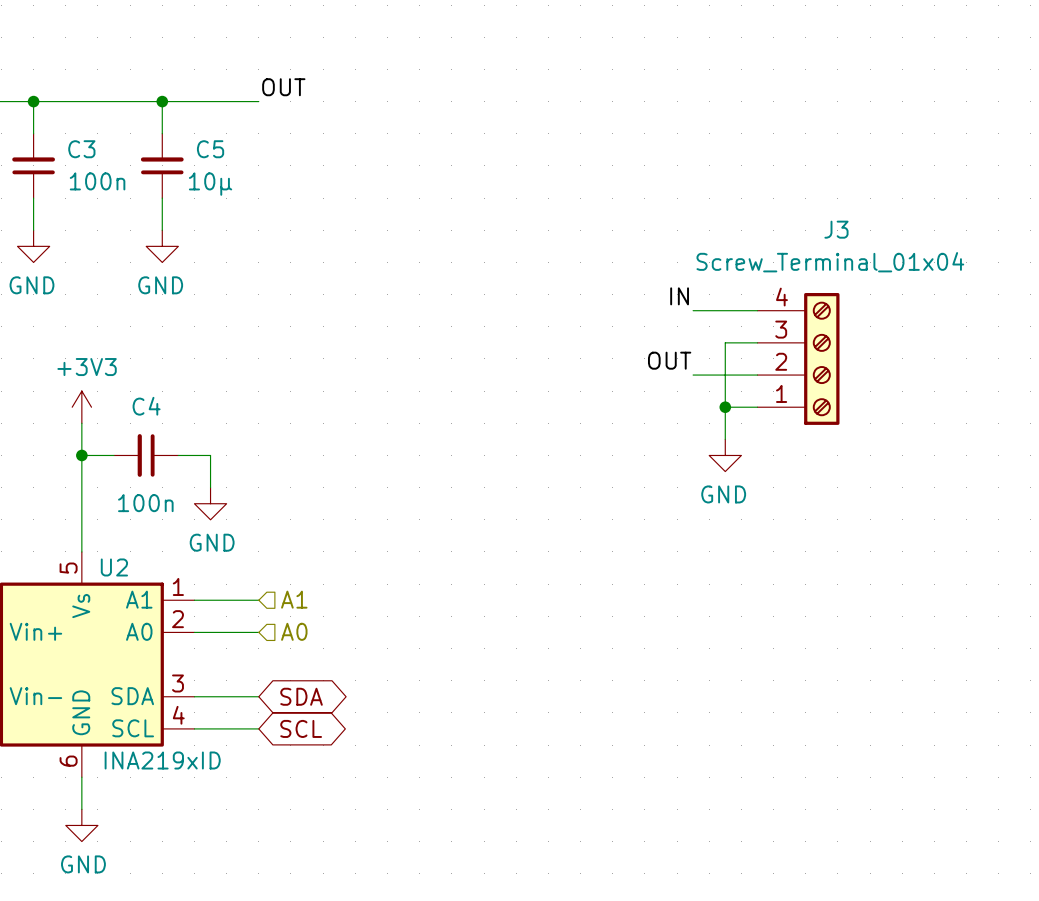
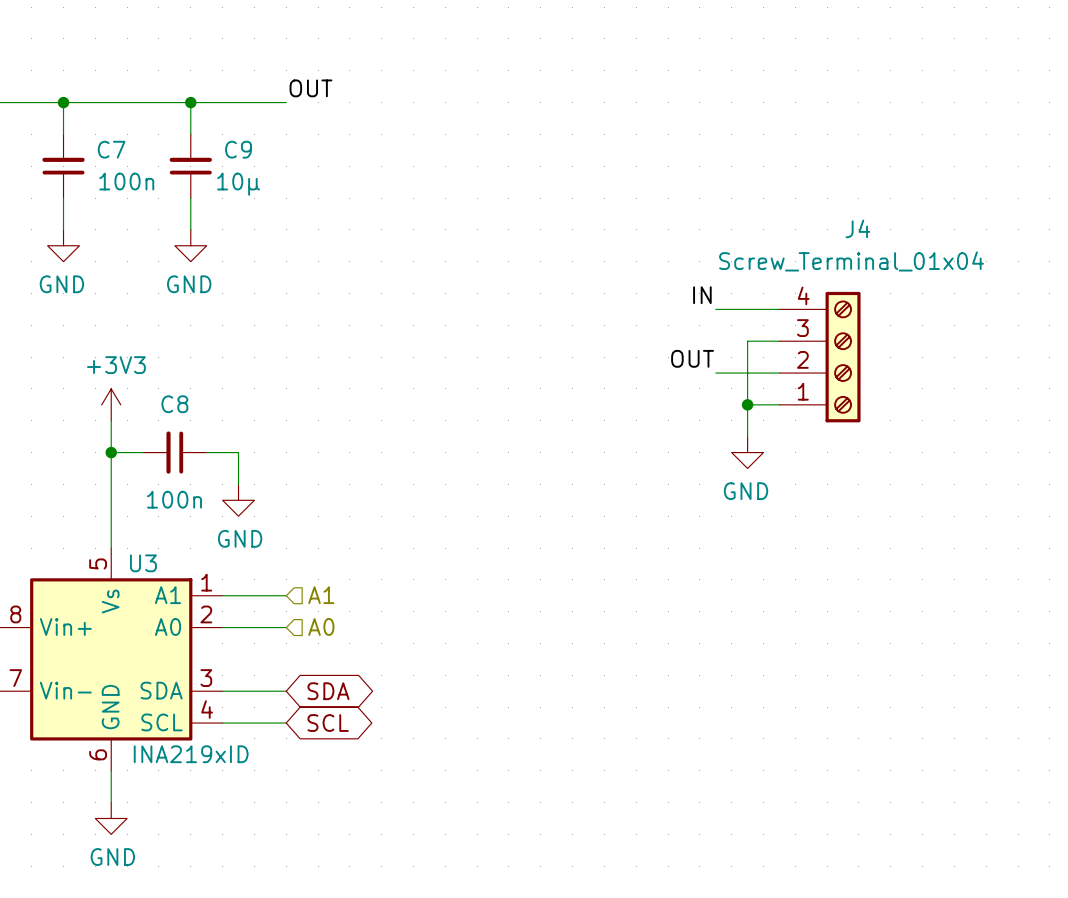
C3 name: C3 (81, 149) -> C7 (111, 149)
C5 name: C5 (210, 149) -> C9 (238, 149)
J3 name: J3 (836, 229) -> J4 (857, 228)
C4 name: C4 (146, 406) -> C8 (174, 404)
U2 name: U2 (114, 567) -> U3 (143, 563)

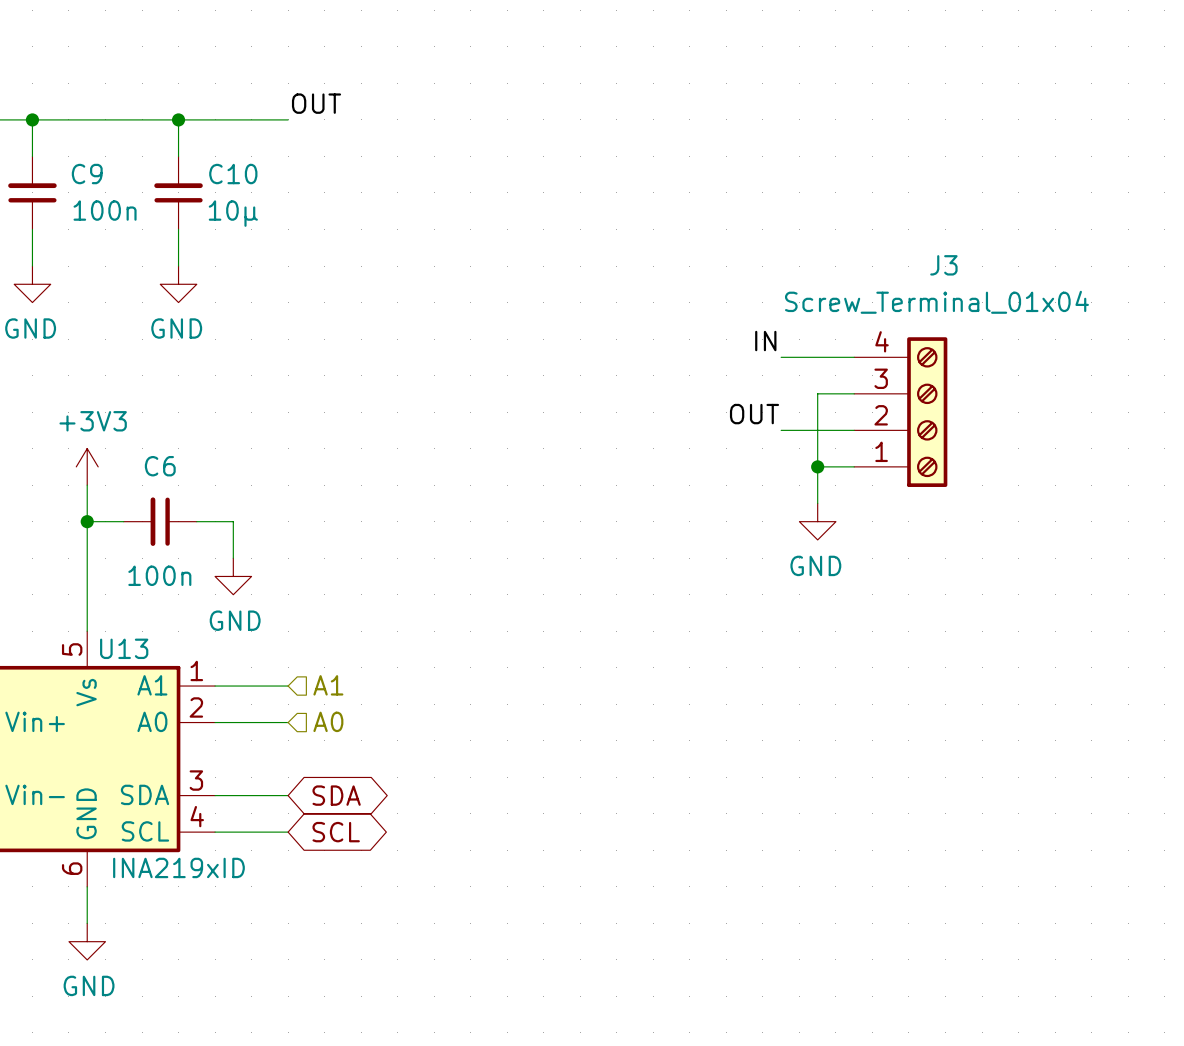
C7 name: C7 (111, 149) -> C9 (87, 174)
C9 name: C9 (238, 149) -> C10 (233, 174)
J4 name: J4 (857, 228) -> J3 (943, 265)
C8 name: C8 (174, 404) -> C6 (160, 466)
U3 name: U3 (143, 563) -> U13 (124, 648)

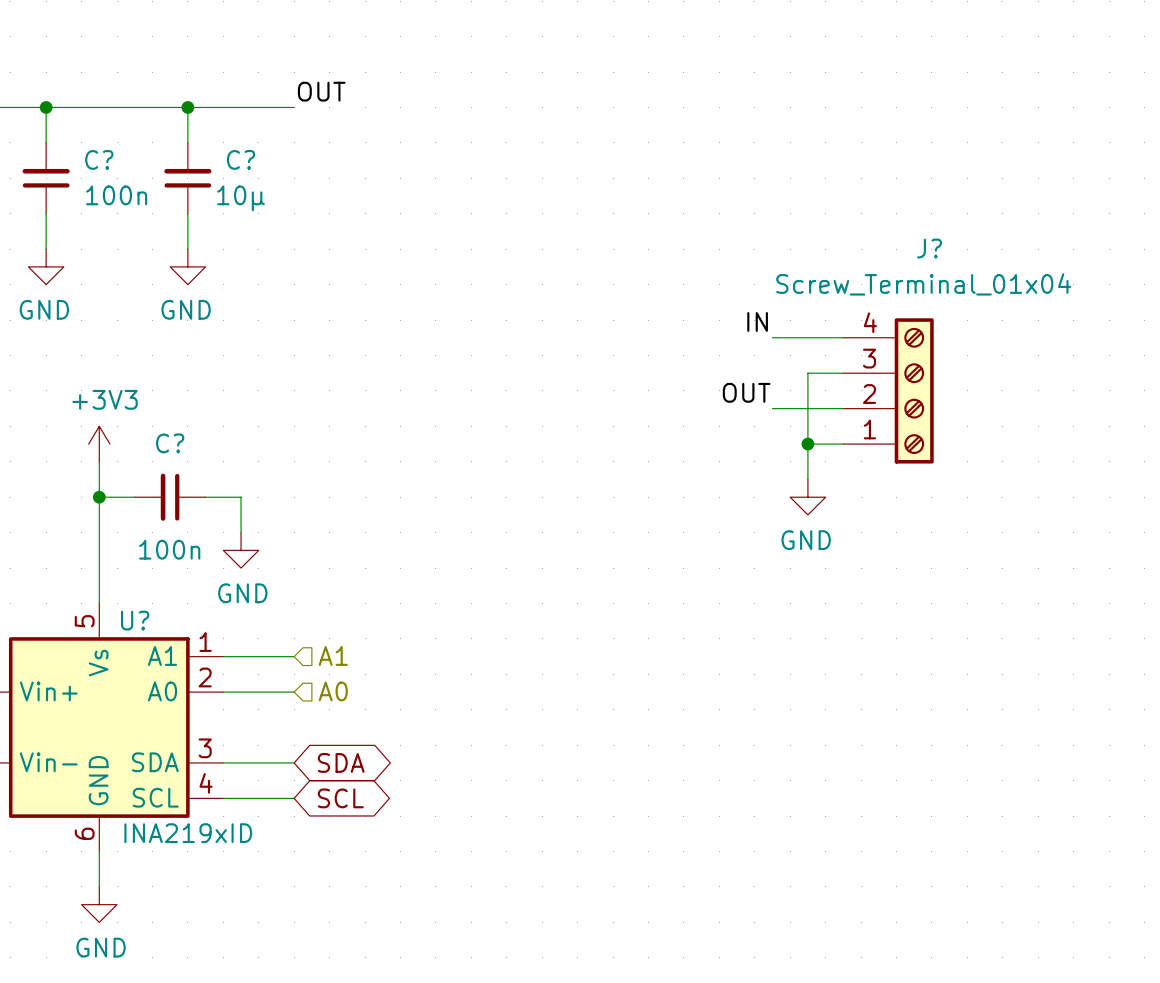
C9 name: C9 (87, 174) -> C? (99, 159)
C10 name: C10 (233, 174) -> C? (241, 159)
J3 name: J3 (943, 265) -> J? (929, 248)
C6 name: C6 (160, 466) -> C? (170, 443)
U13 name: U13 (124, 648) -> U? (135, 620)

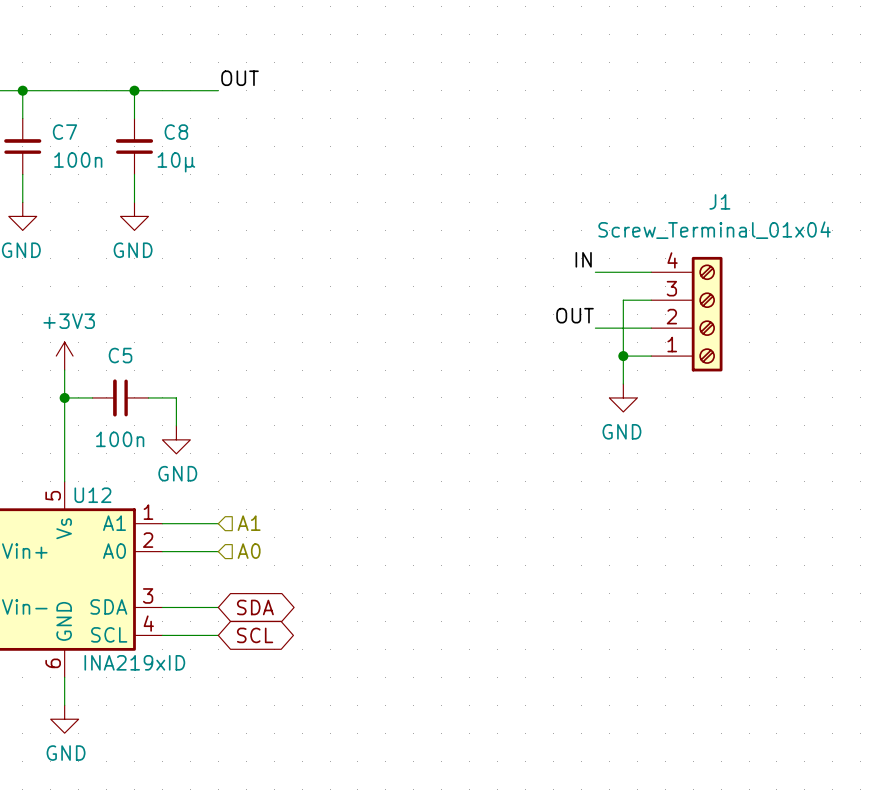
C? name: C? (99, 159) -> C7 (64, 132)
C? name: C? (241, 159) -> C8 (176, 132)
J? name: J? (929, 248) -> J1 (719, 201)
C? name: C? (170, 443) -> C5 (120, 355)
U? name: U? (135, 620) -> U12 (92, 495)

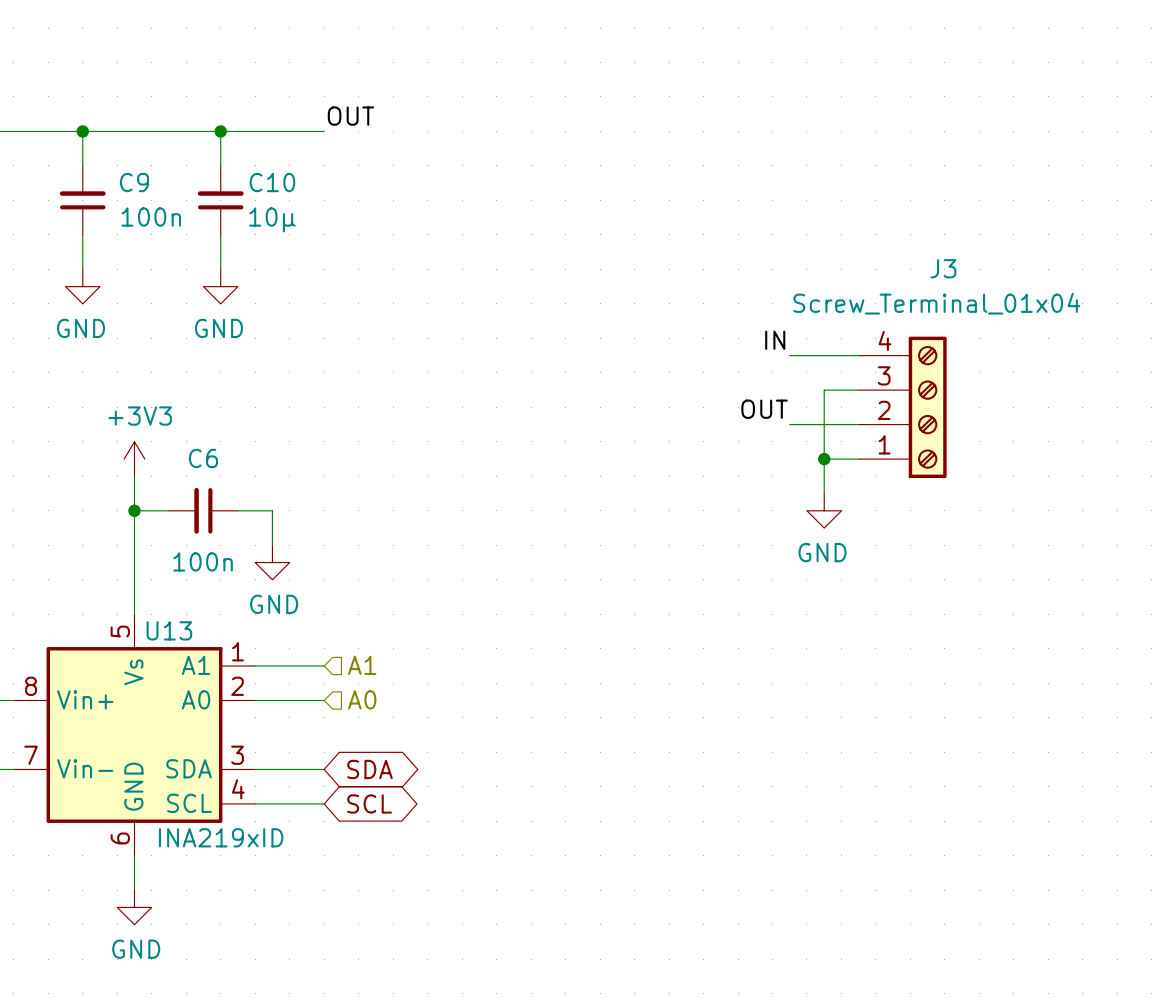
C7 name: C7 (64, 132) -> C9 (134, 182)
C8 name: C8 (176, 132) -> C10 (272, 182)
J1 name: J1 (719, 201) -> J3 (943, 268)
C5 name: C5 (120, 355) -> C6 (203, 458)
U12 name: U12 (92, 495) -> U13 (169, 630)

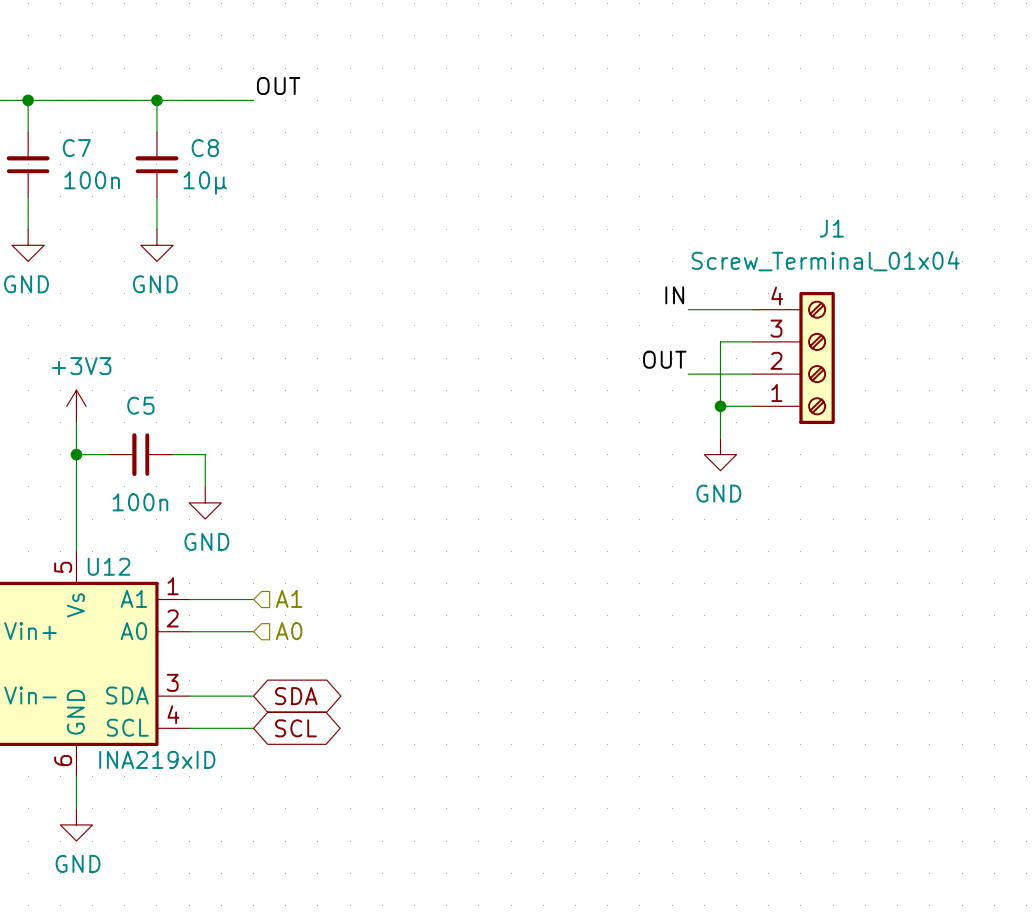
C9 name: C9 (134, 182) -> C7 (76, 148)
C10 name: C10 (272, 182) -> C8 (205, 148)
J3 name: J3 (943, 268) -> J1 (831, 228)
C6 name: C6 (203, 458) -> C5 (140, 405)
U13 name: U13 (169, 630) -> U12 (109, 566)

